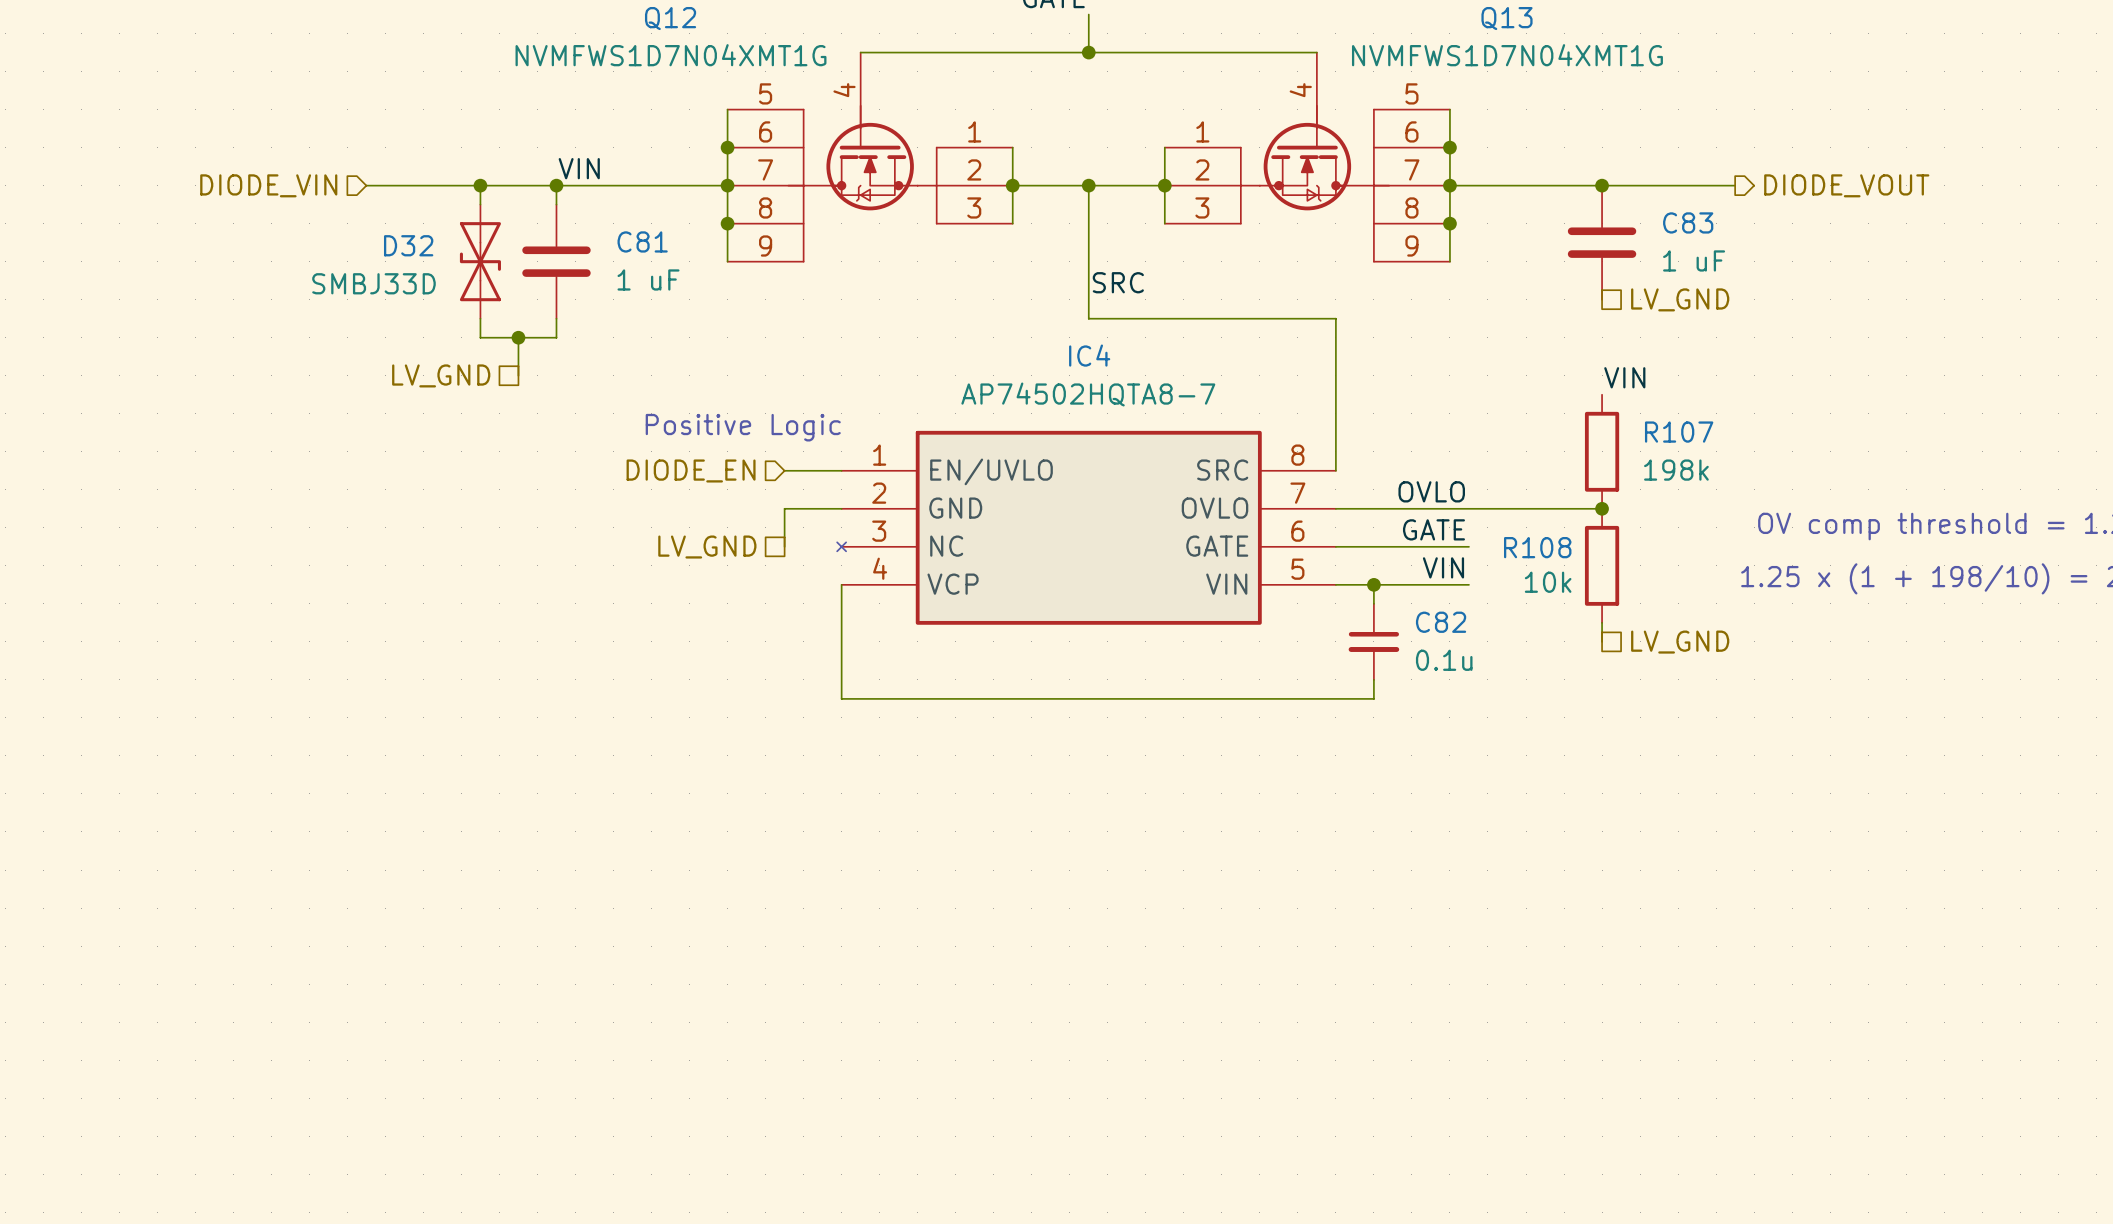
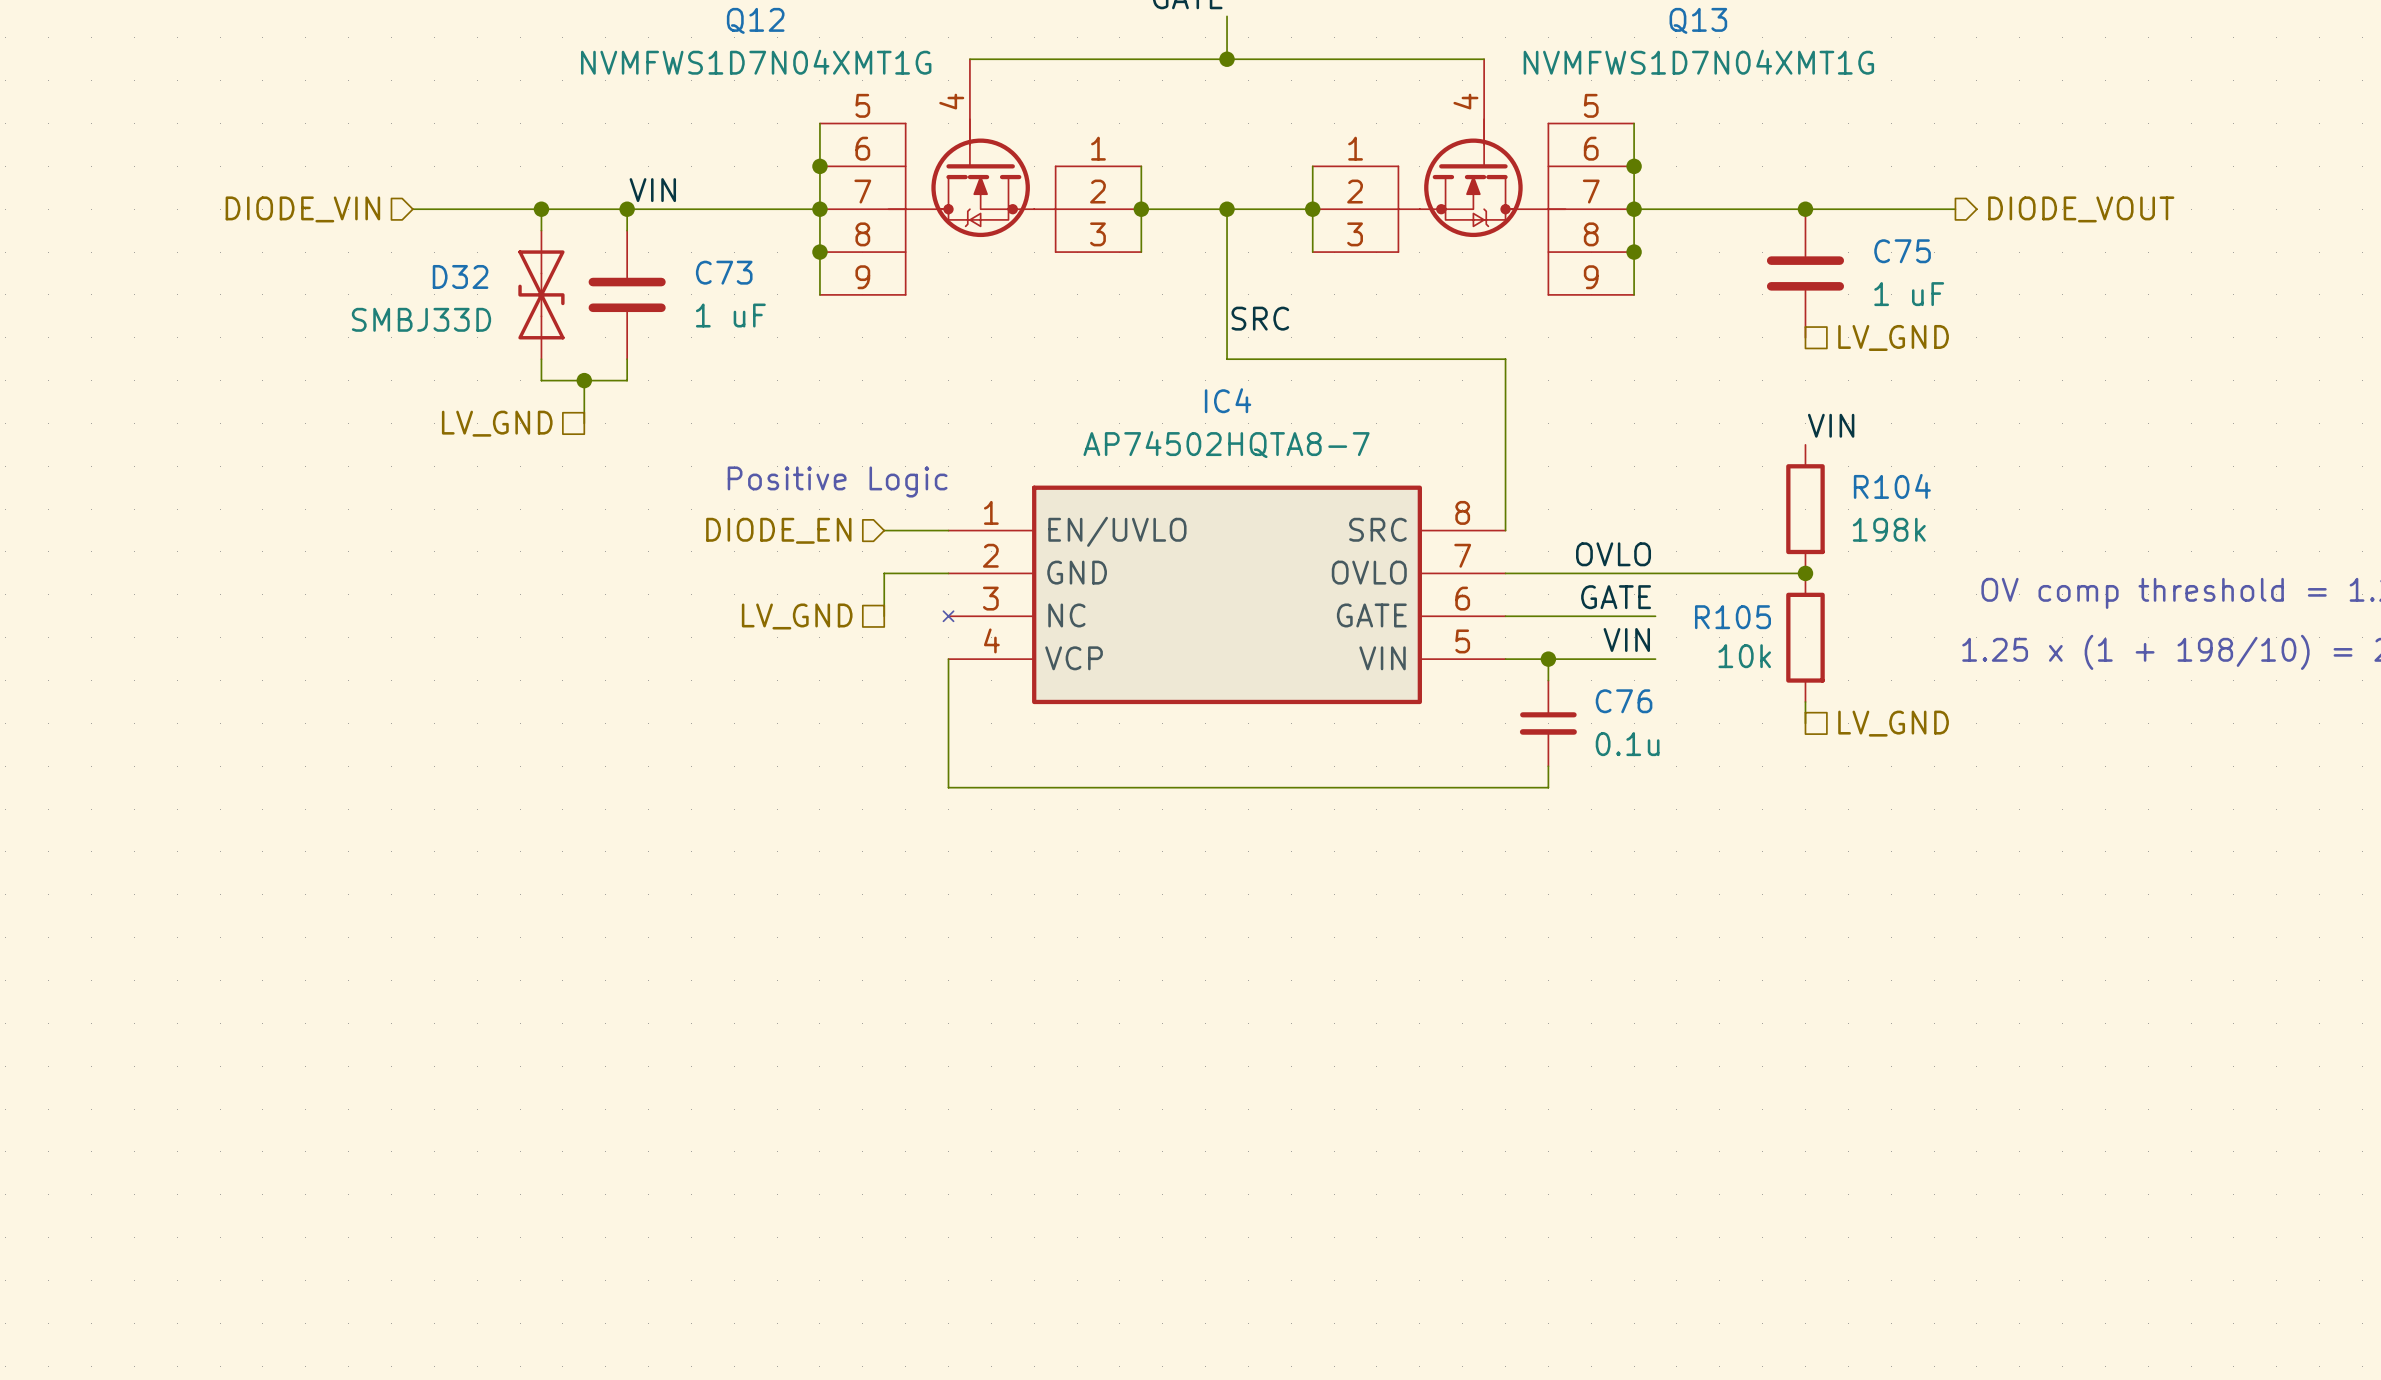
C83 name: C83 (1688, 222) -> C75 (1902, 251)
C81 name: C81 (642, 241) -> C73 (724, 272)
R107 name: R107 (1679, 432) -> R104 (1892, 486)
R108 name: R108 (1537, 547) -> R105 (1732, 617)
C82 name: C82 (1441, 622) -> C76 (1624, 701)

